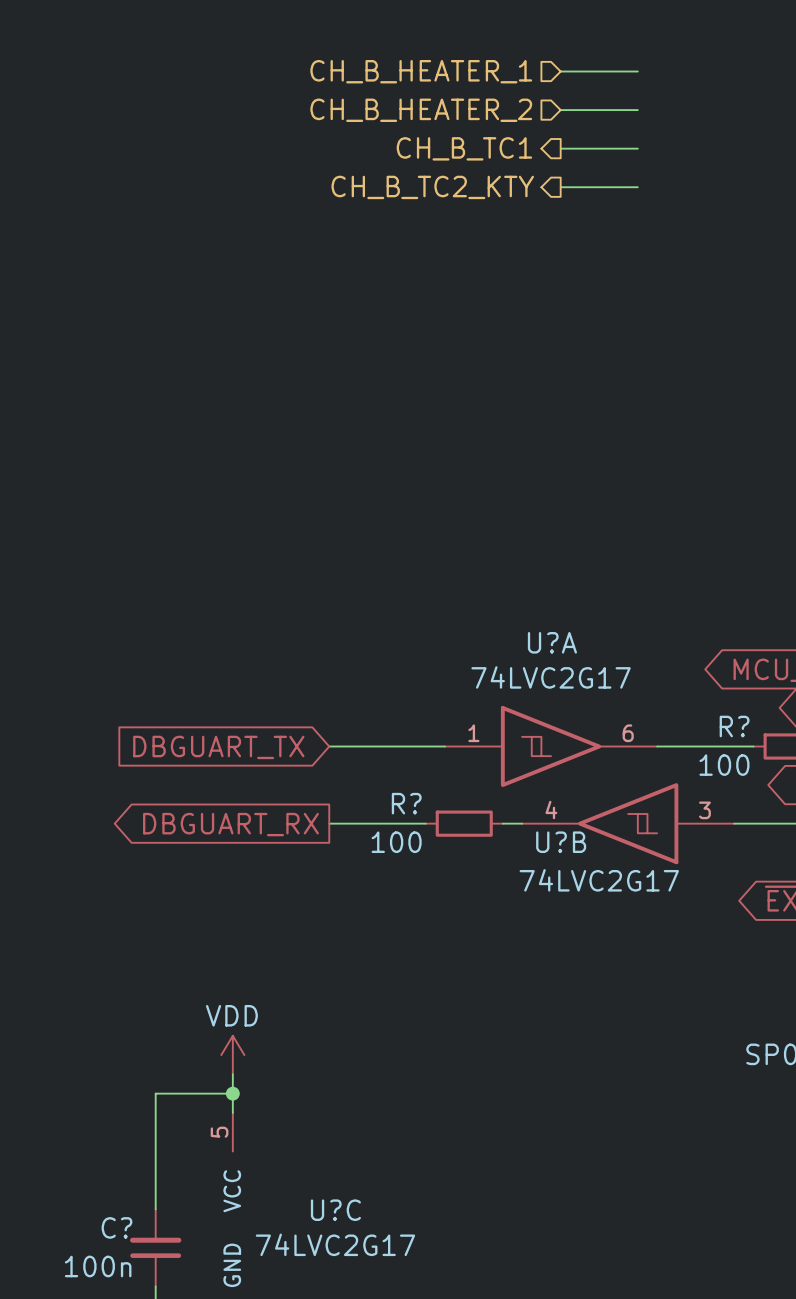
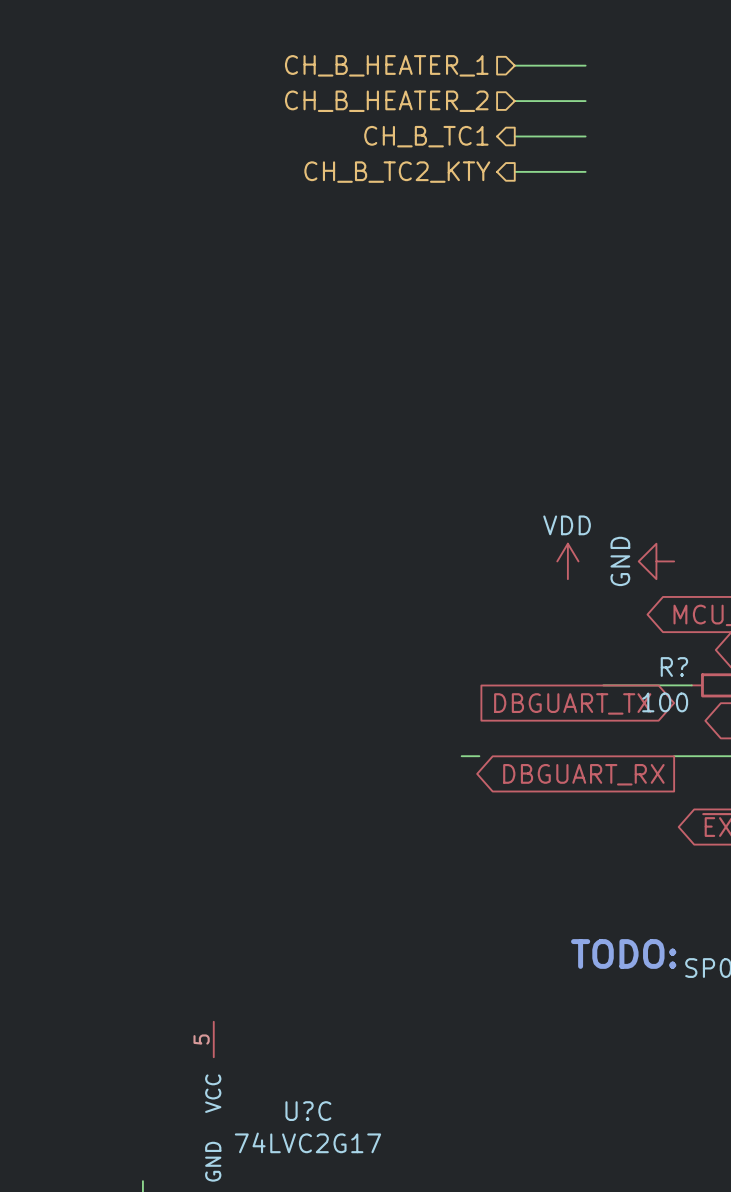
power symbol: none -> VDD (567, 561)
power symbol: none -> GND (656, 561)
wire: (329, 746) (444, 746) -> none
U?A: 74LVC2G17 (551, 746) -> none
global label: DBGUART_TX (218, 747) -> none
global label: none -> DBGUART_TX (572, 703)
wire: (329, 823) (425, 823) -> none
R?: 100 (464, 823) -> none
U?B: 74LVC2G17 (628, 823) -> none
global label: DBGUART_RX (230, 824) -> none
global label: none -> DBGUART_RX (583, 774)
text: none -> TODO: (623, 953)
power symbol: VDD (232, 1055) -> none
wire: (232, 1074) (232, 1112) -> none
wire: (232, 1093) (155, 1093) (155, 1209) -> none
junction: (232, 1093) -> none
C?: 100n (155, 1247) -> none

